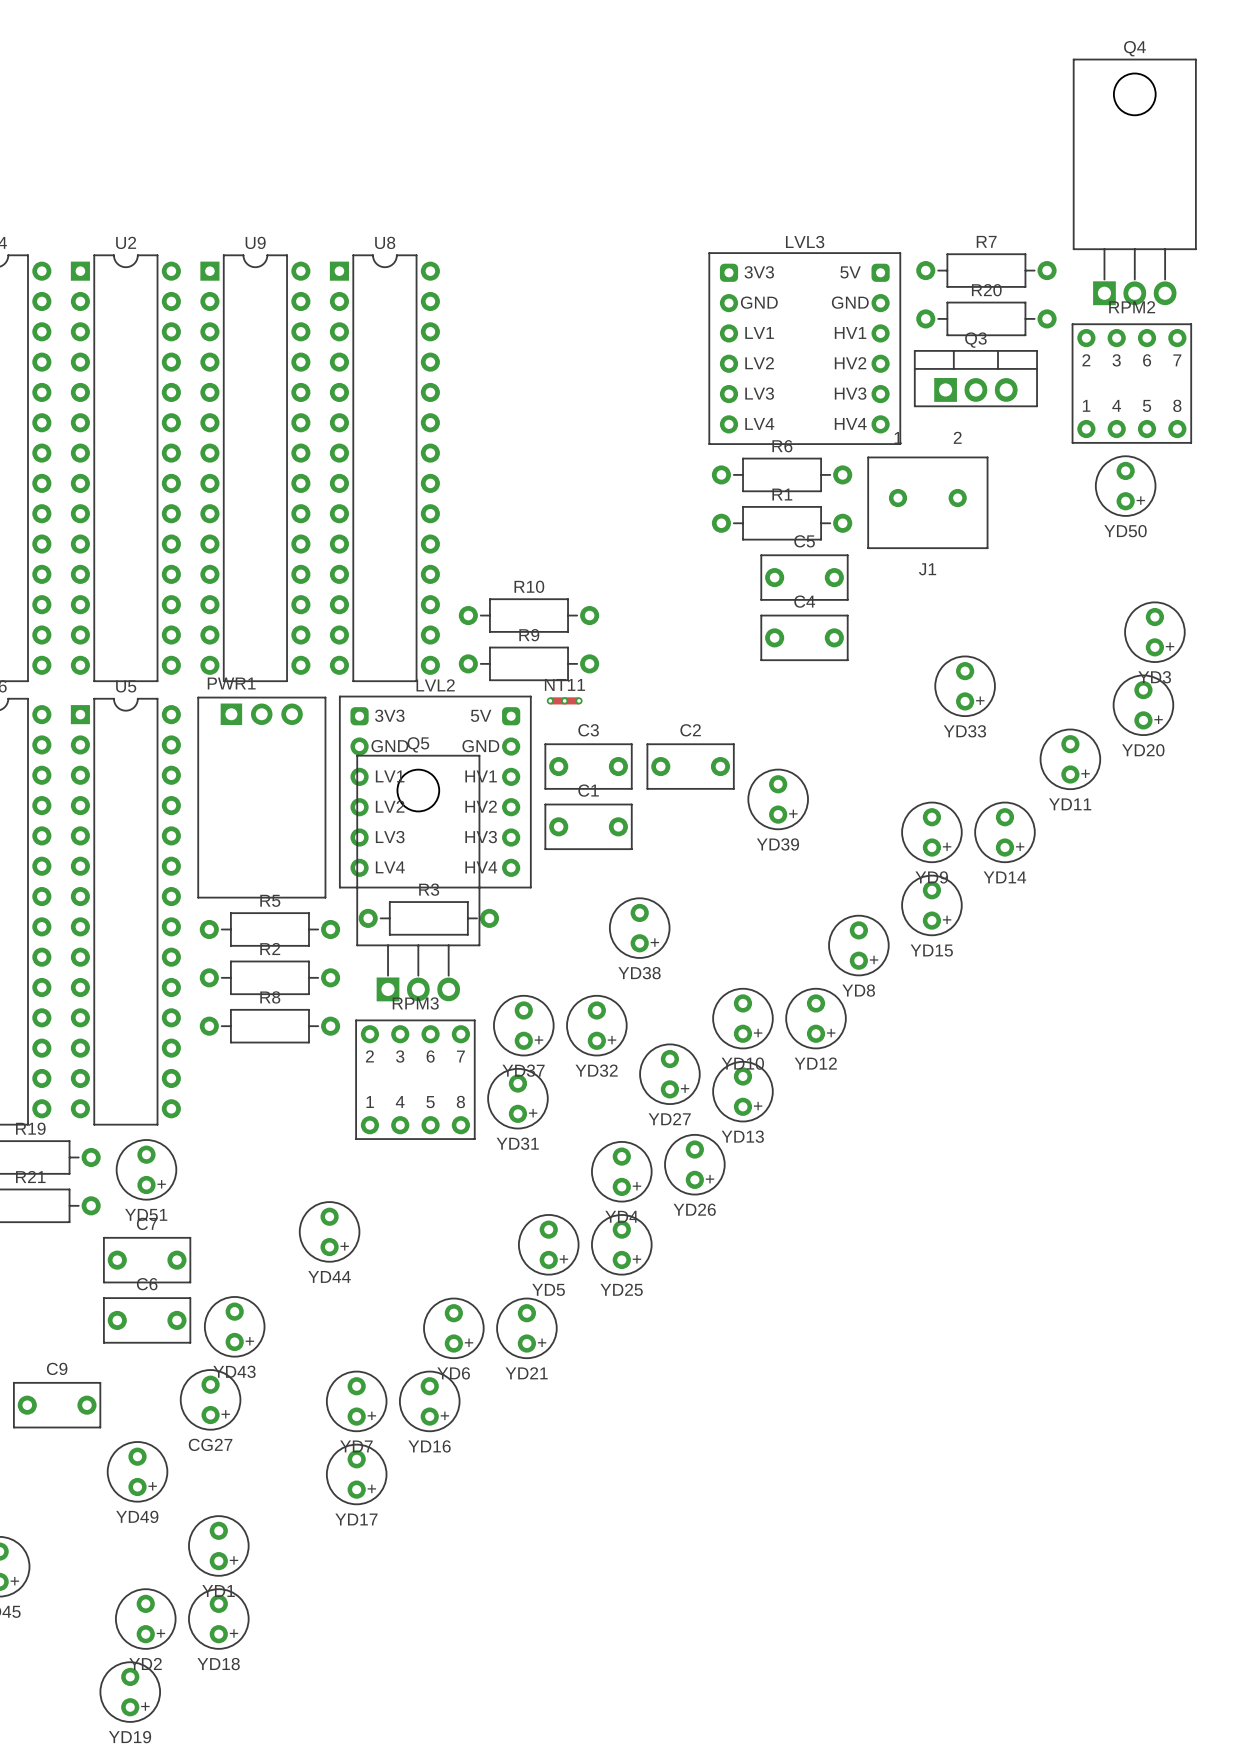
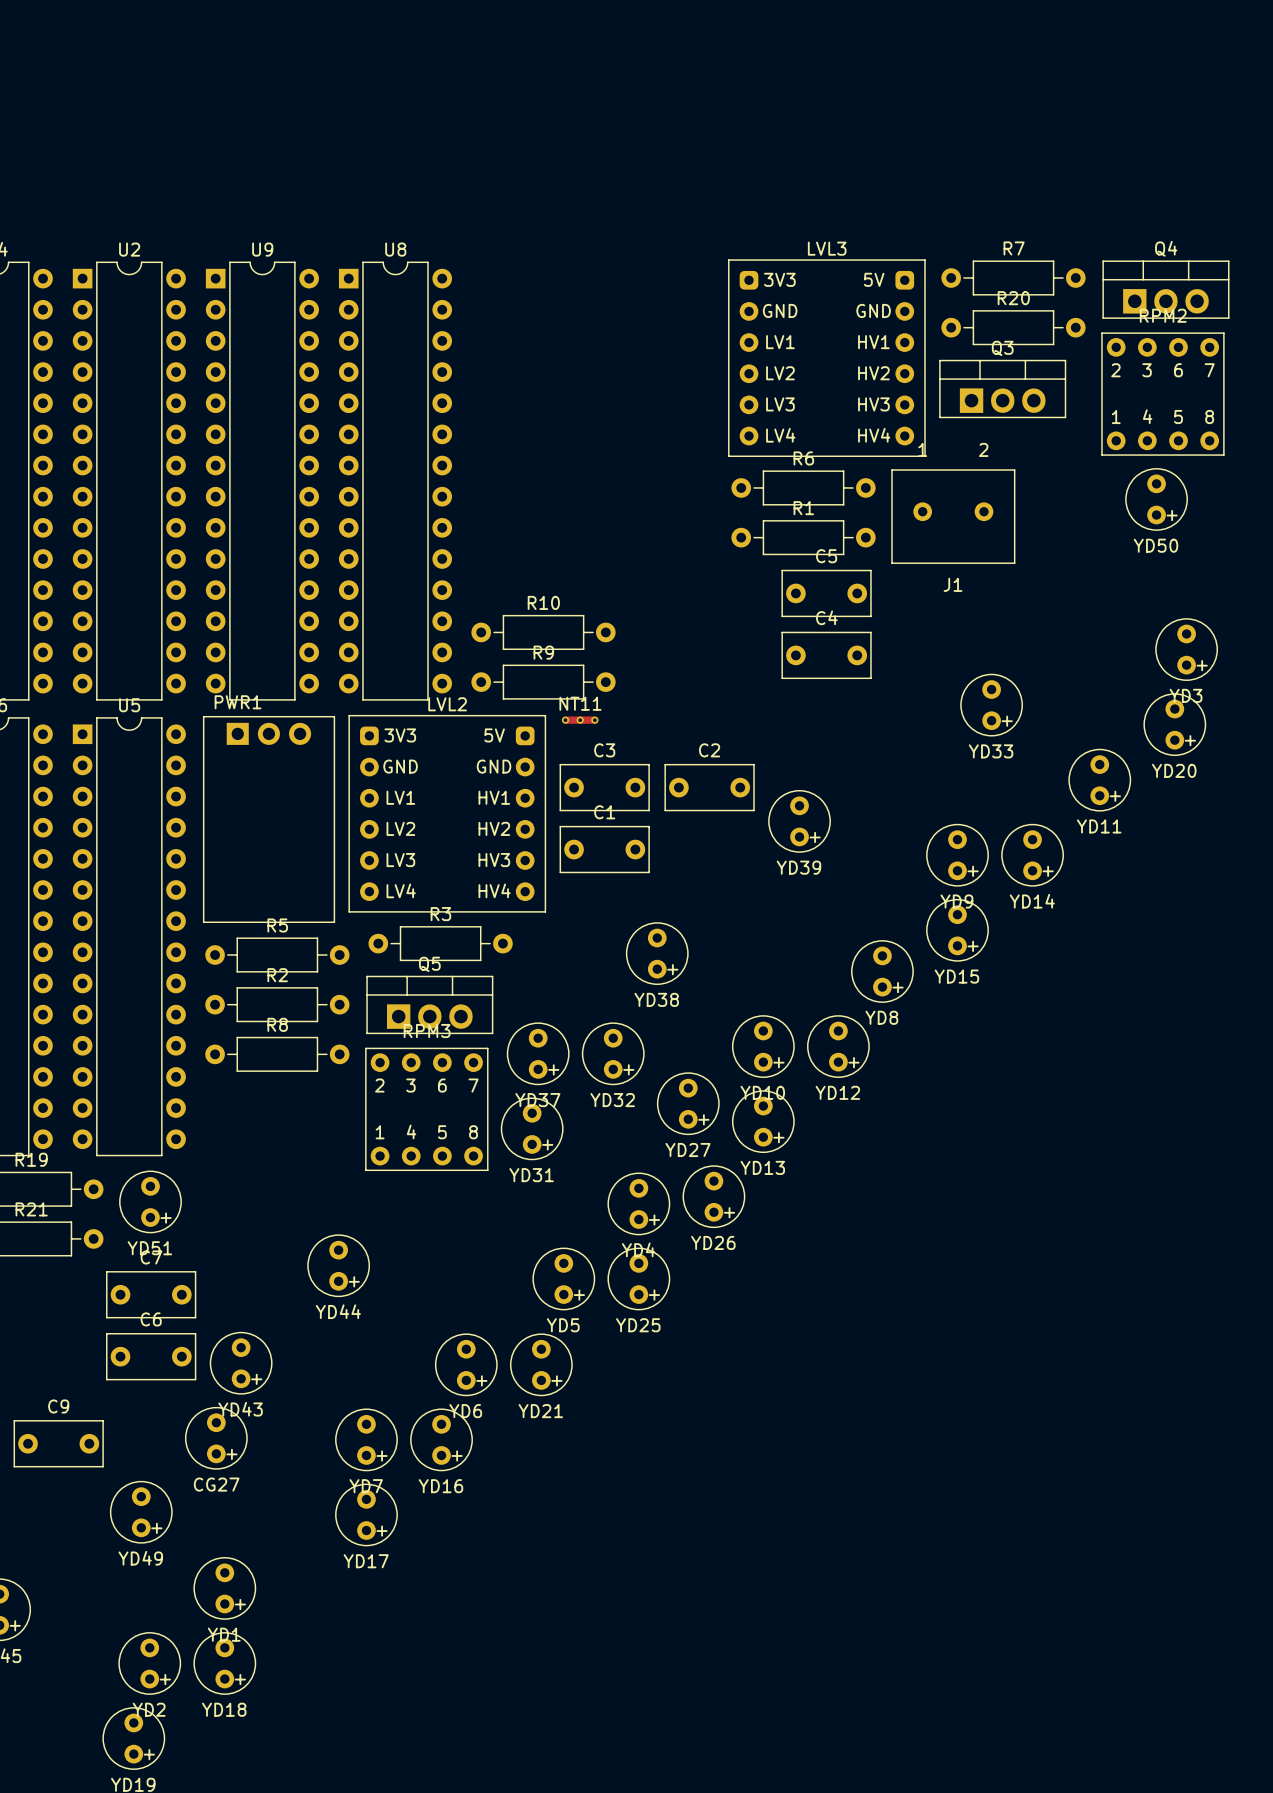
Q4 name position: Q4 (1134, 48) -> Q4 (1166, 248)
Q4 footprint: [1072, 58, 1197, 306] -> [1102, 260, 1230, 319]
Q5 name position: Q5 (418, 744) -> Q5 (429, 964)
Q5 footprint: [356, 754, 481, 1002] -> [366, 975, 494, 1035]

